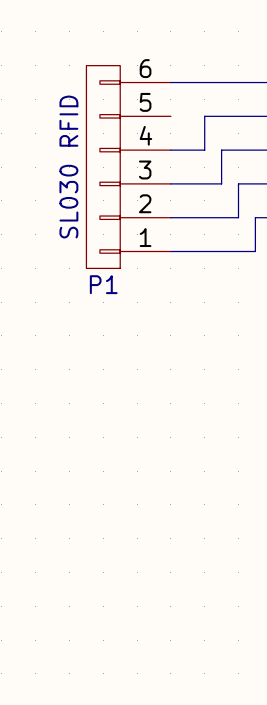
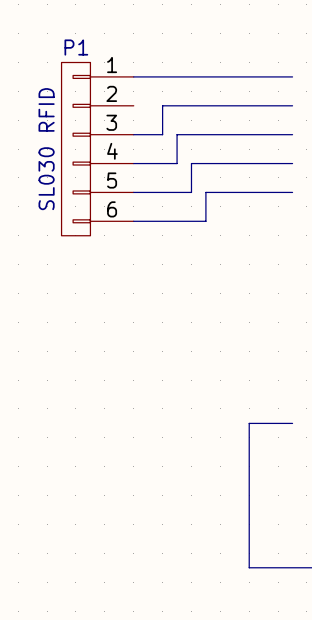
P1 flip: as is (103, 167) -> up-down (75, 149)

